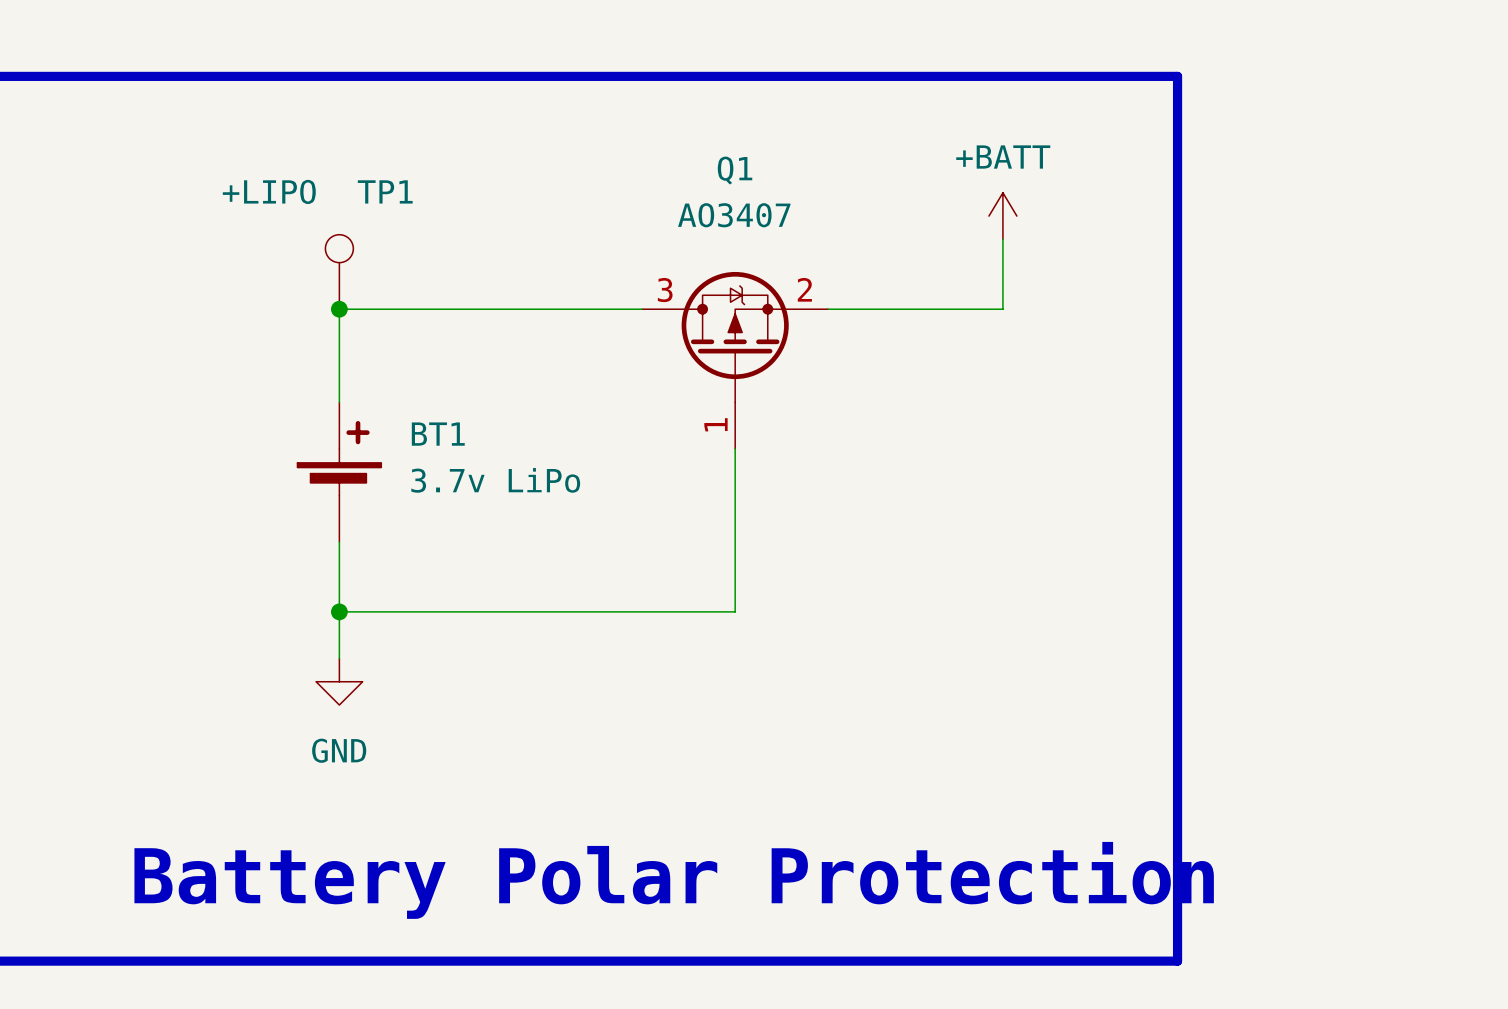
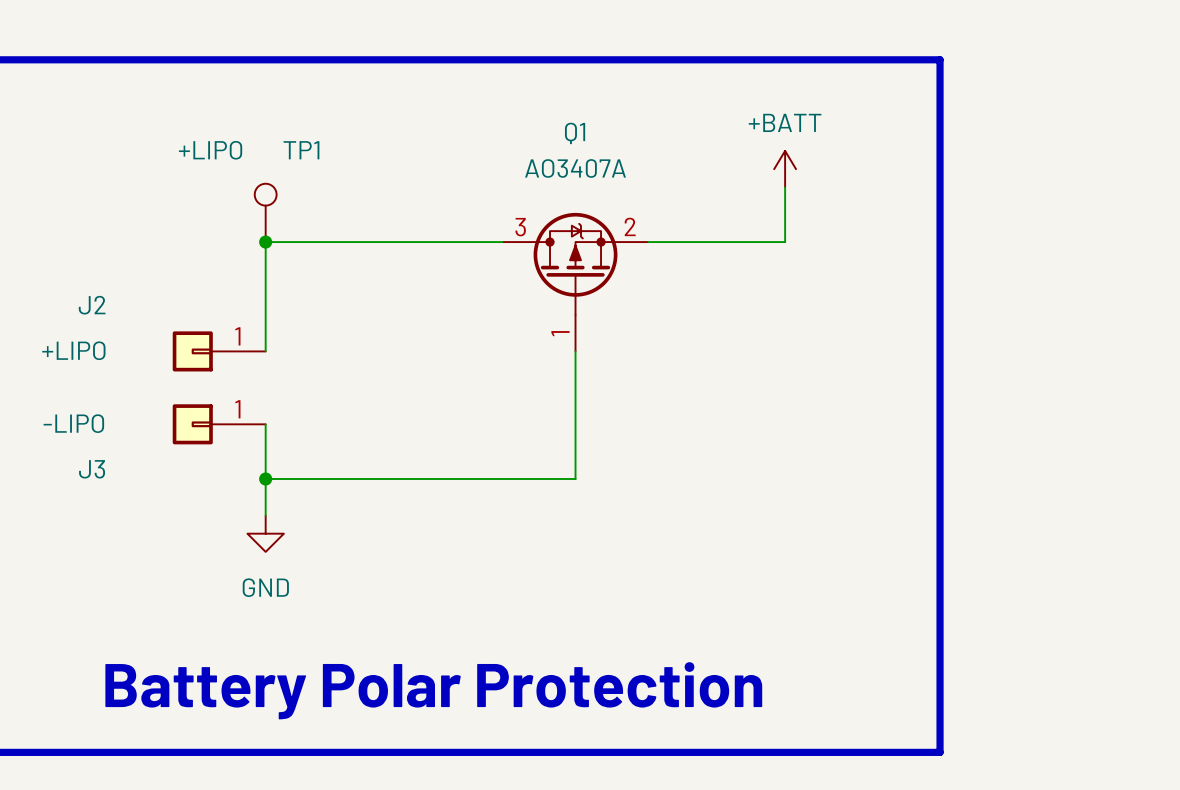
line: (1177, 76) (1177, 961) -> (921, 59) (940, 59) (940, 752) (921, 752)
Q1 value: AO3407 (734, 215) -> AO3407A (575, 168)
J2: none -> +LIPO (219, 351)
BT1: 3.7v LiPo (339, 472) -> none
J3: none -> -LIPO (219, 424)

